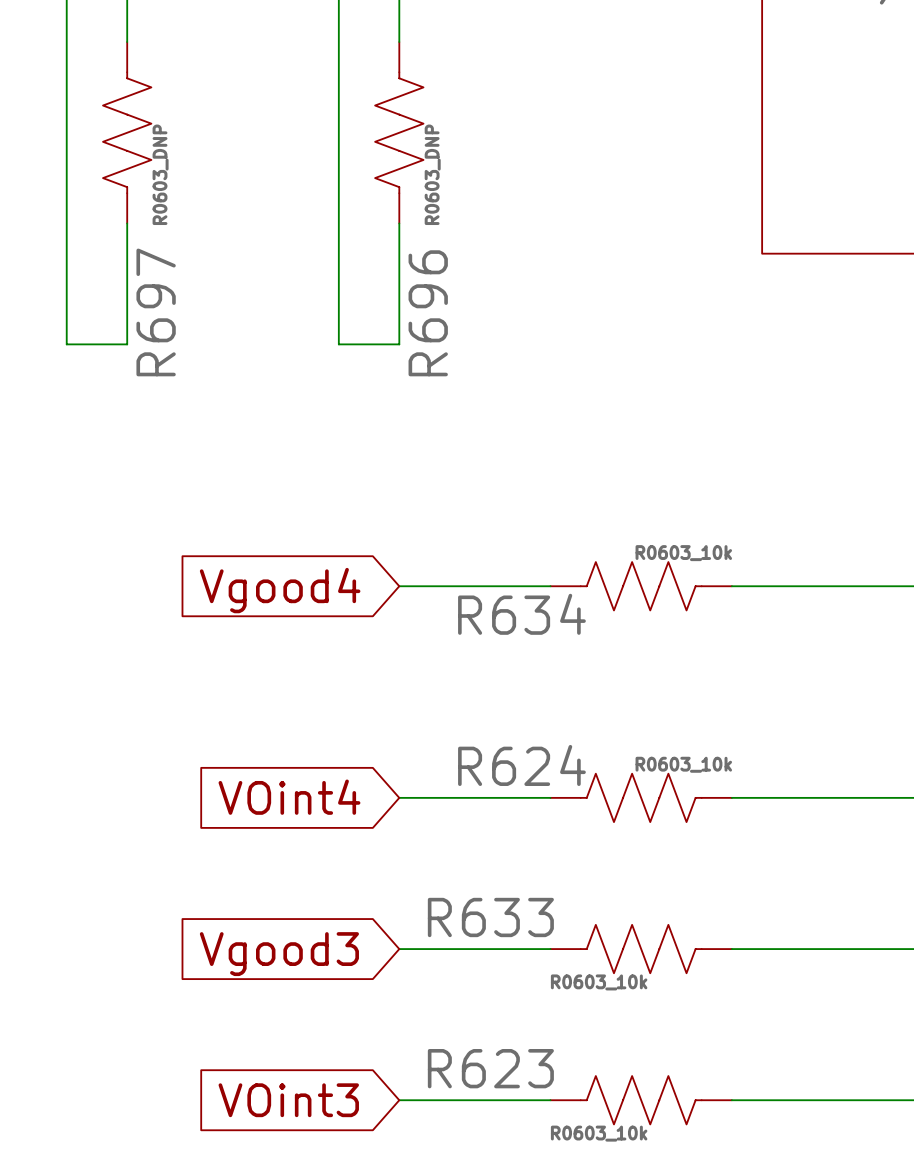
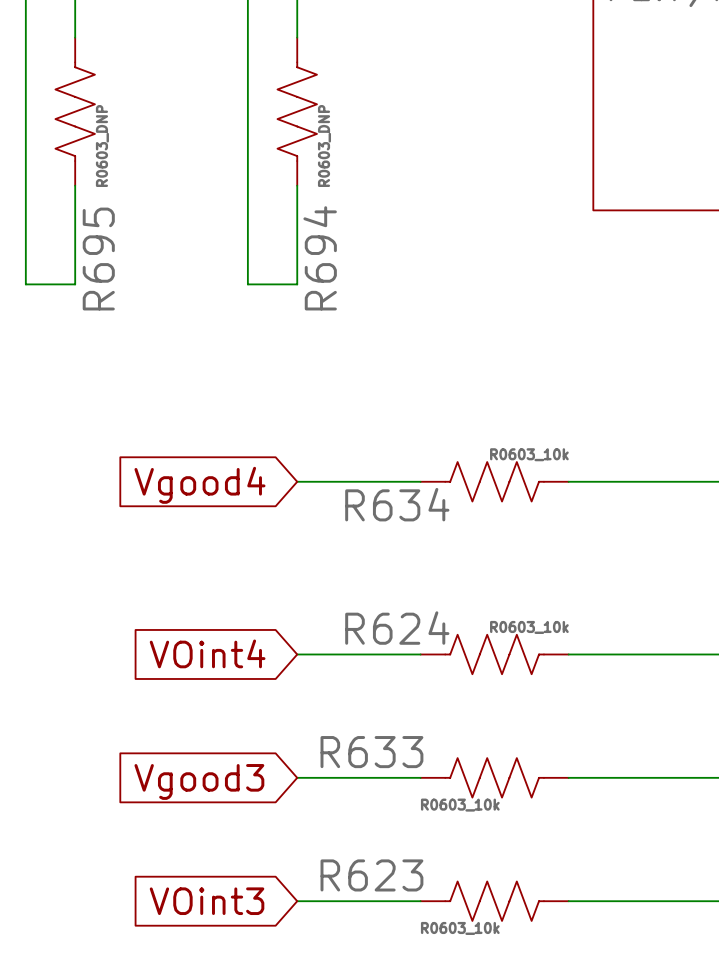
R697 name: R697 (156, 312) -> R695 (98, 259)
R696 name: R696 (428, 313) -> R694 (320, 258)

